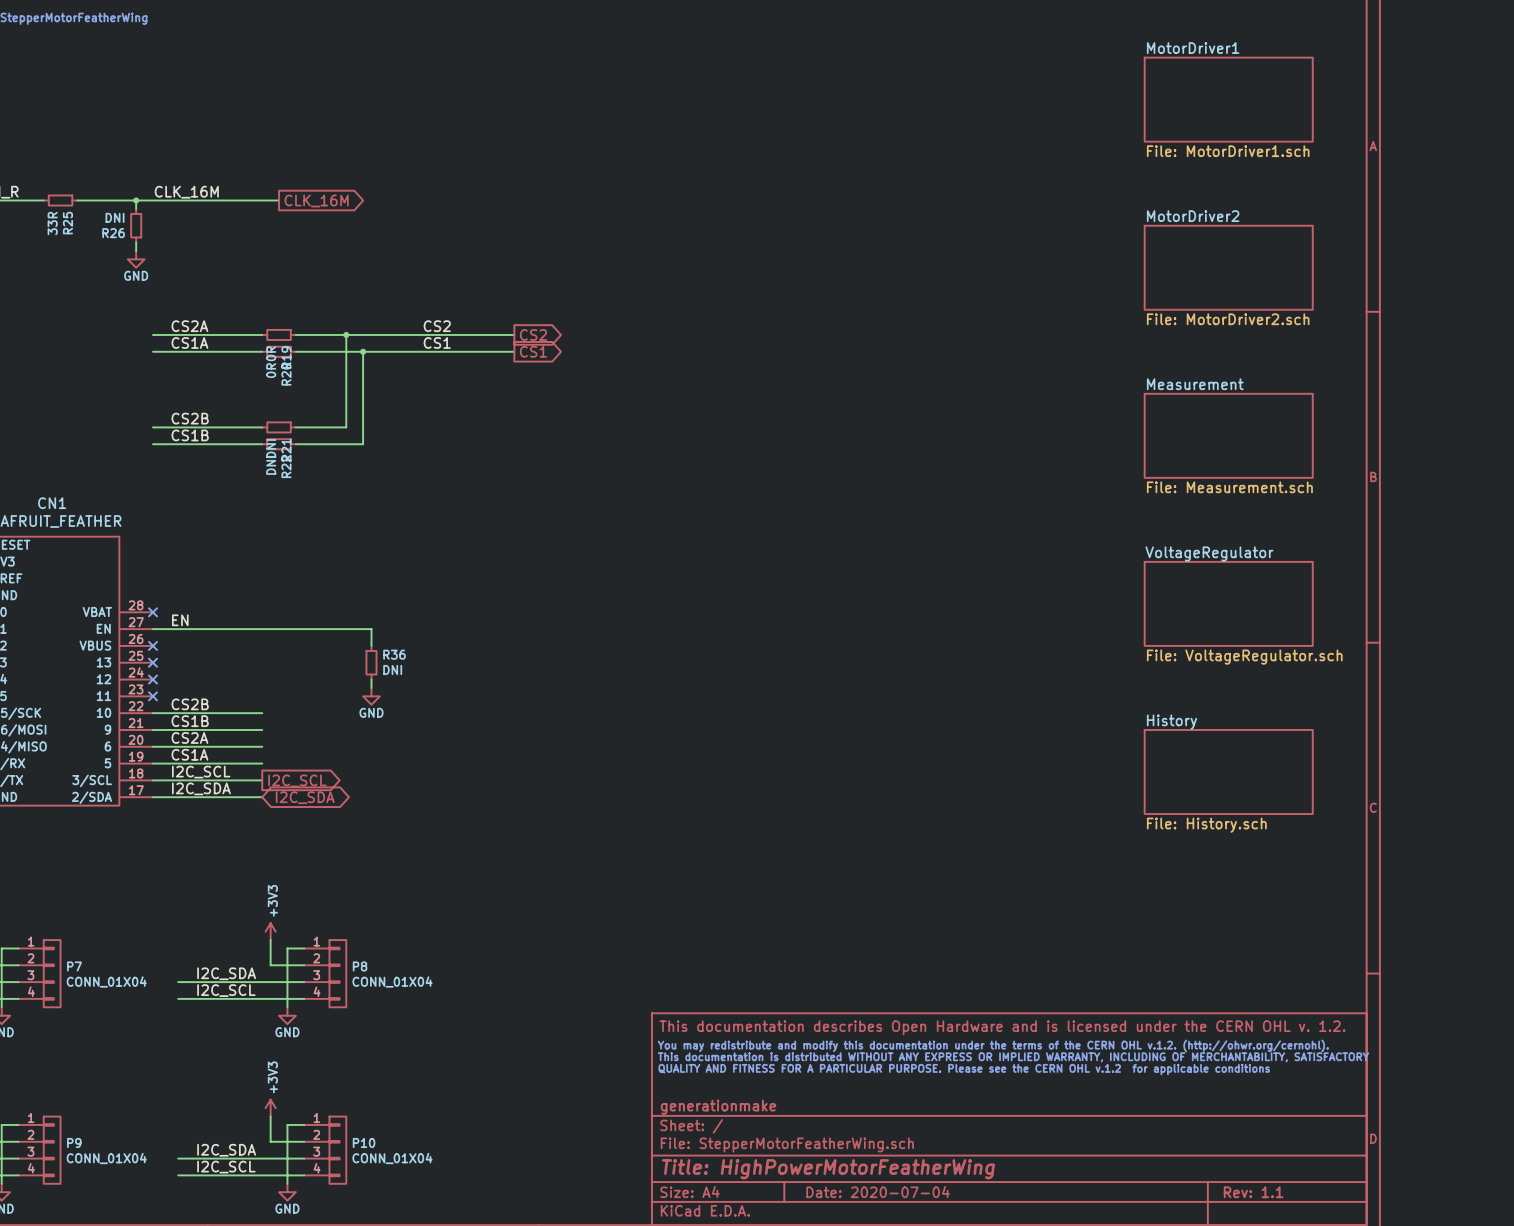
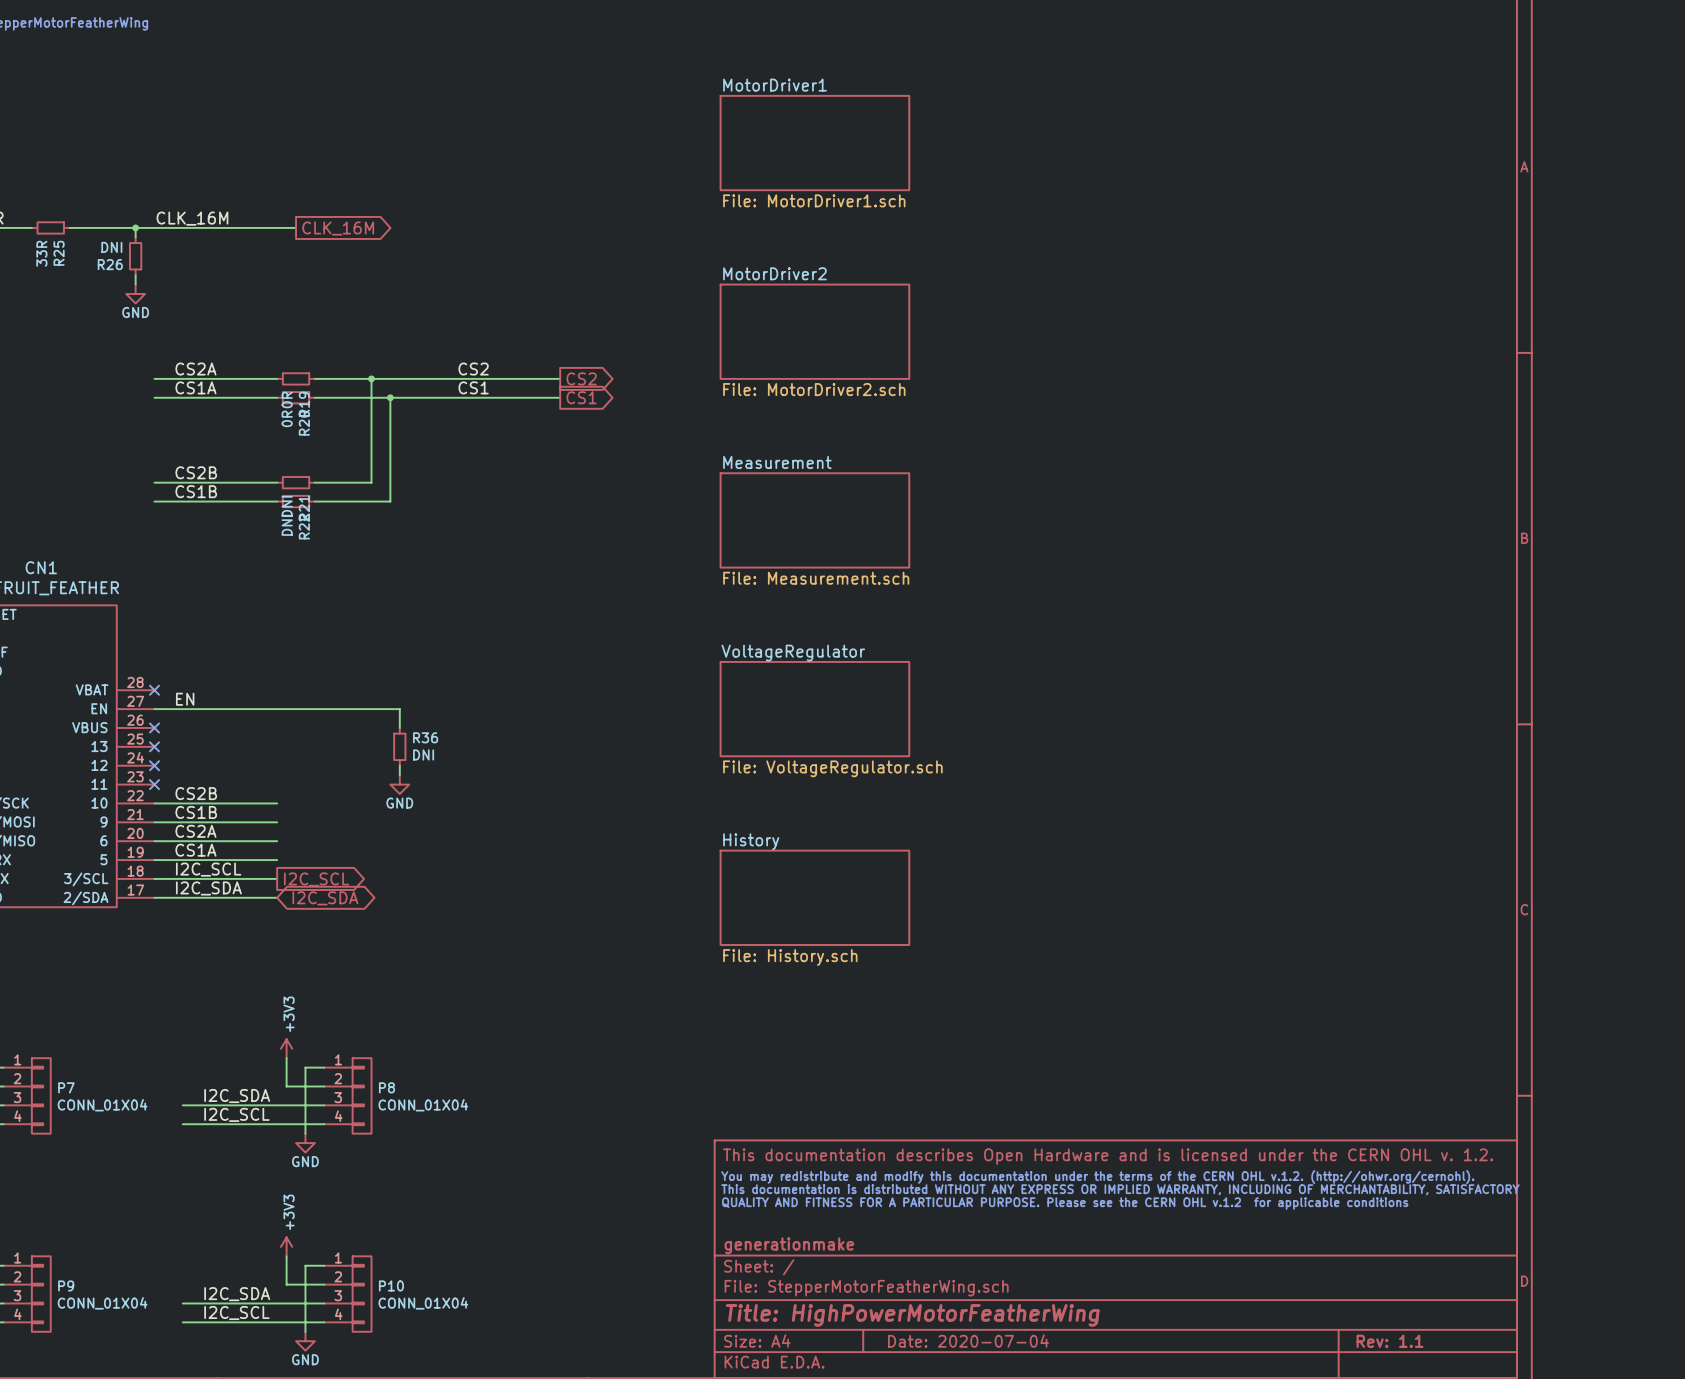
sheet MotorDriver1 position: (1228, 99) -> (814, 143)
sheet MotorDriver2 position: (1228, 267) -> (814, 331)
sheet Measurement: File: Measurement.sch (1228, 435) -> none
sheet Measurement: none -> File: Measurement.sch (814, 520)
sheet VoltageRegulator: File: VoltageRegulator.sch (1228, 603) -> none
sheet VoltageRegulator: none -> File: VoltageRegulator.sch (814, 709)
sheet History: File: History.sch (1228, 771) -> none
sheet History: none -> File: History.sch (814, 897)

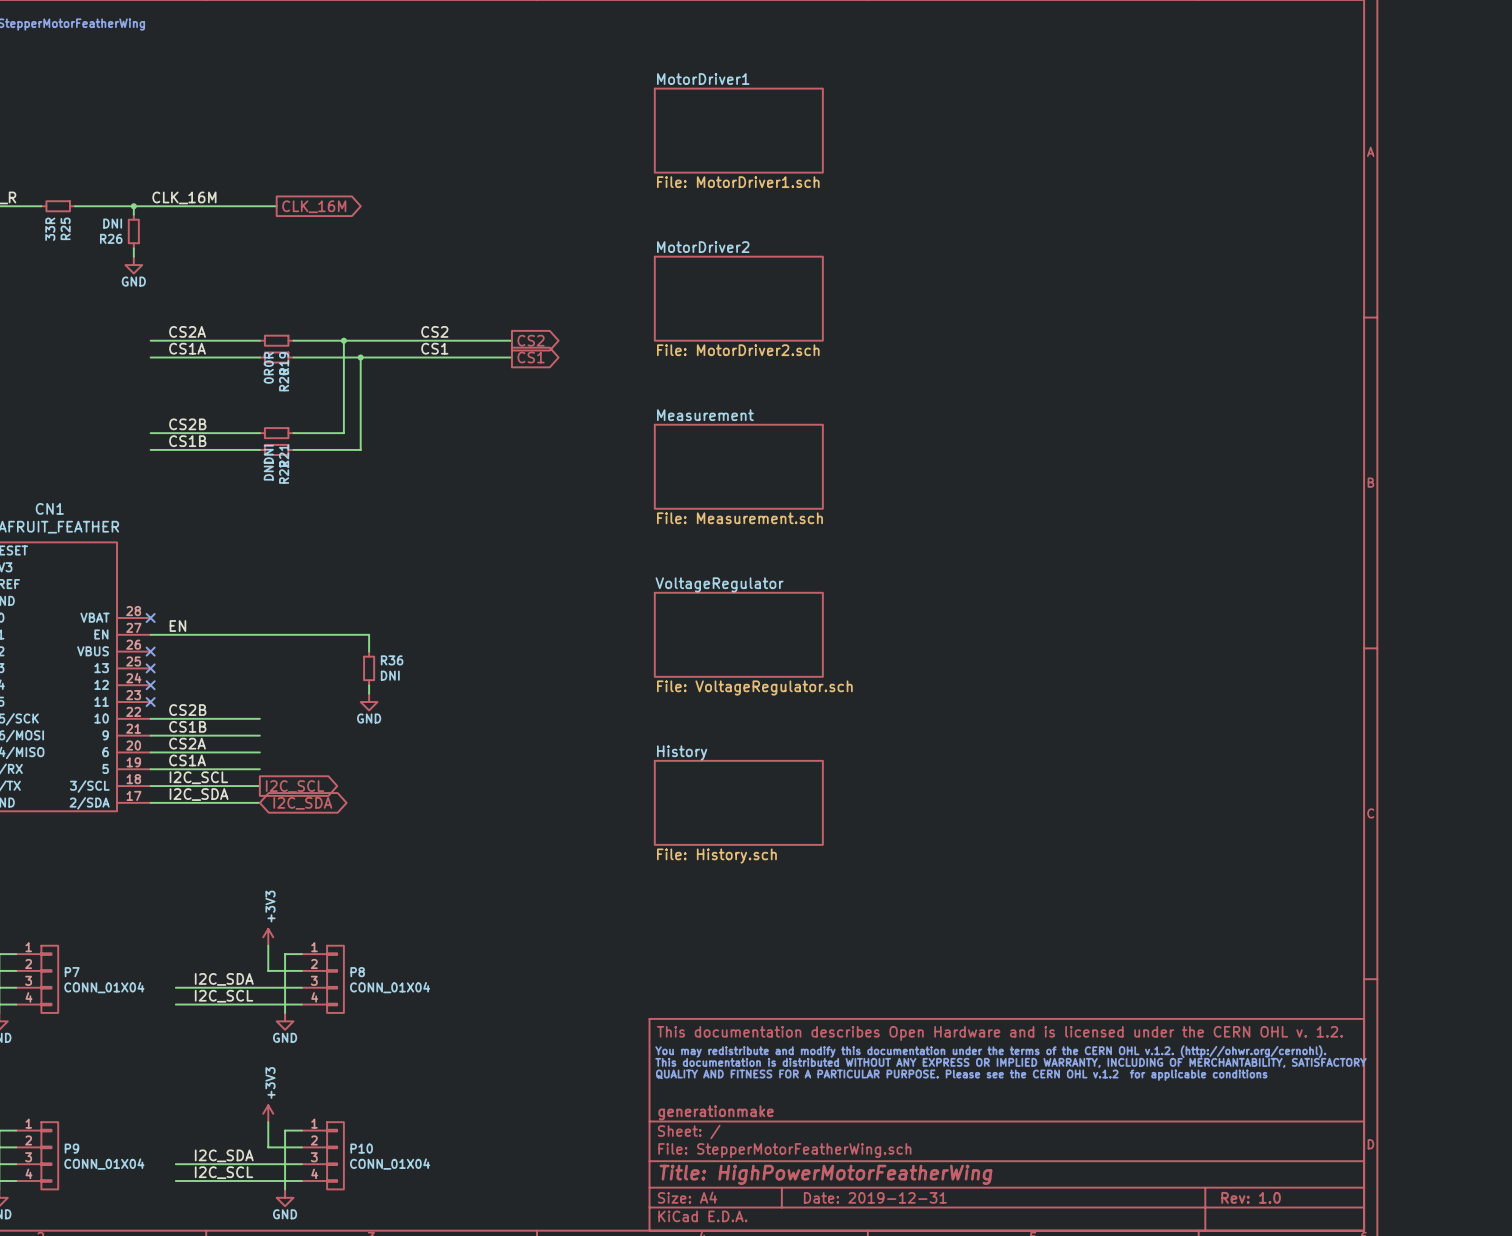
title block: Date: 2020-07-04 (968, 1341) -> Date: 2019-12-31 (875, 1197)
title block: Rev: 1.1 (1390, 1341) -> Rev: 1.0 (1251, 1197)

